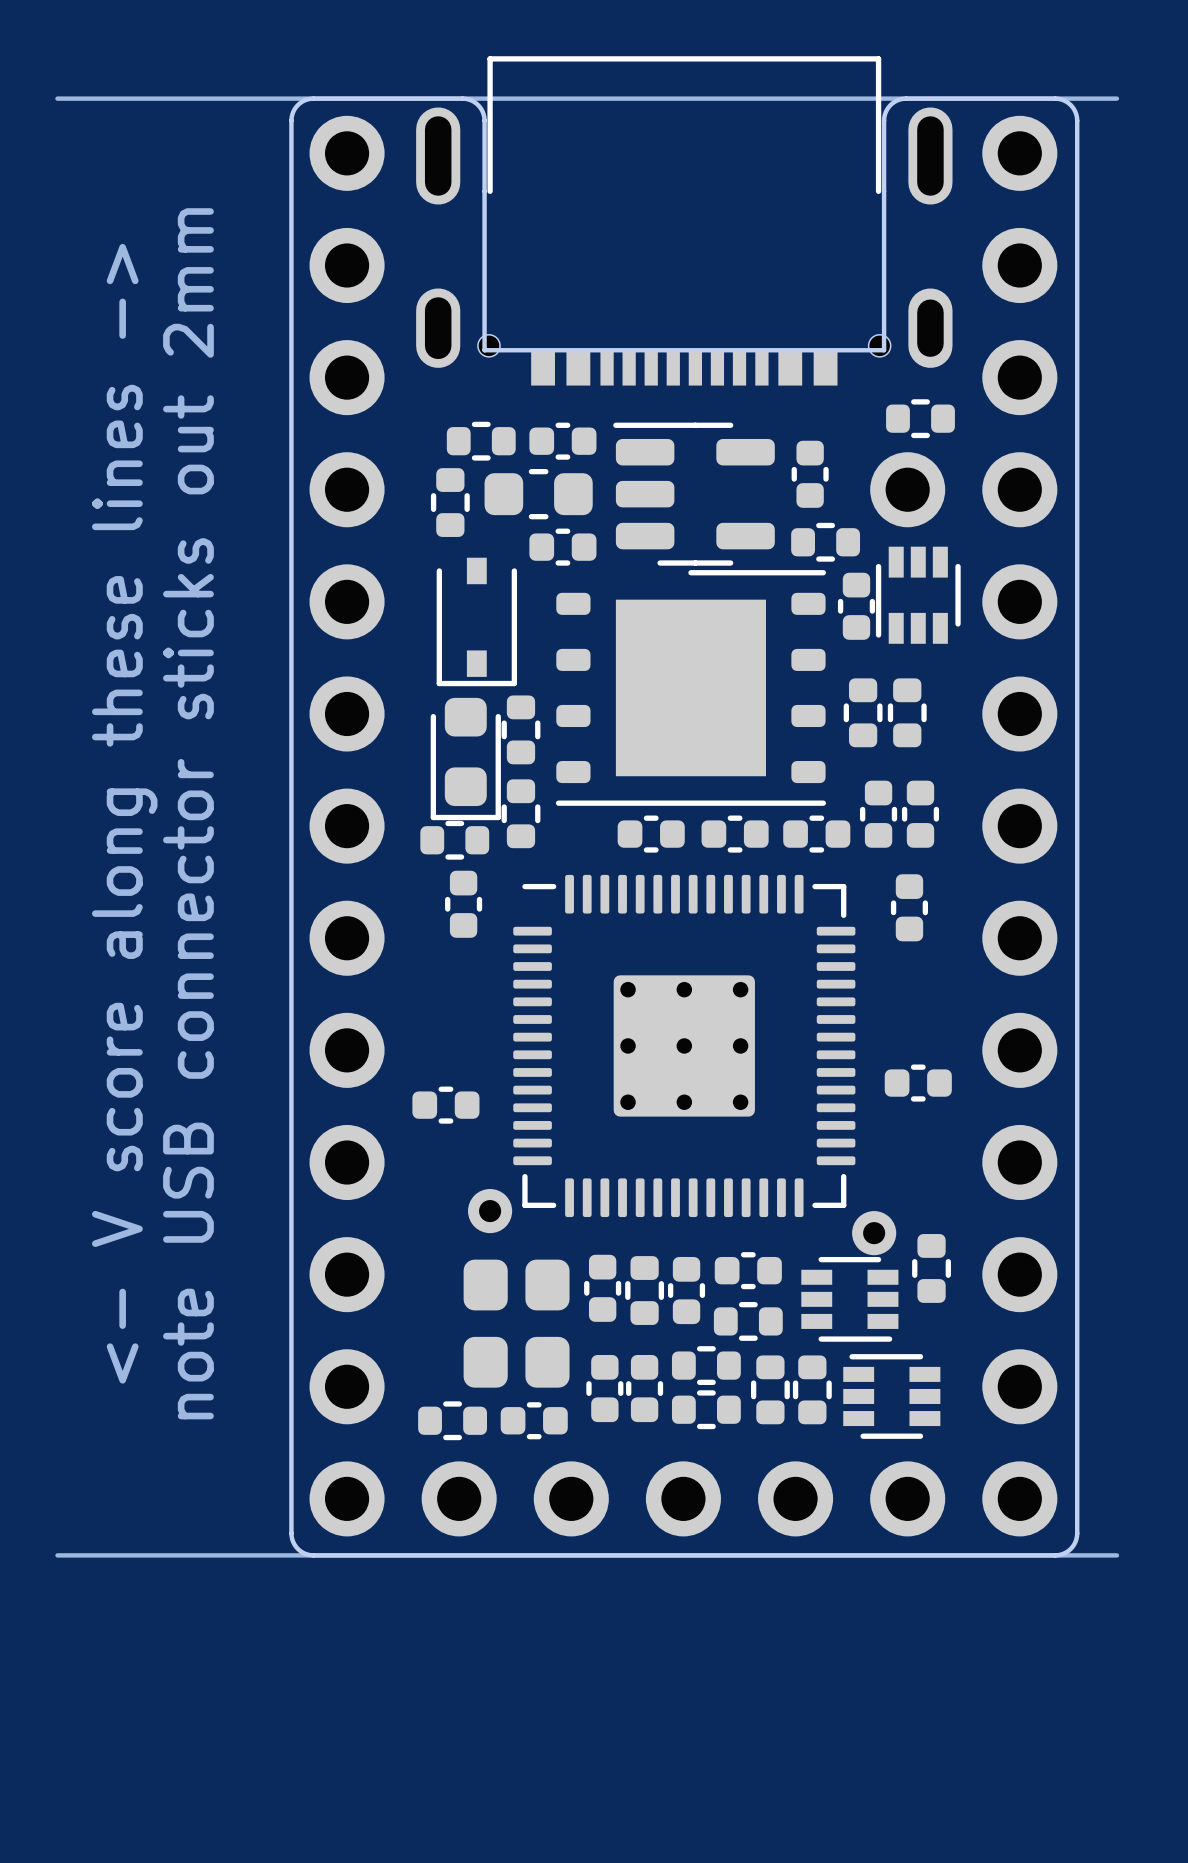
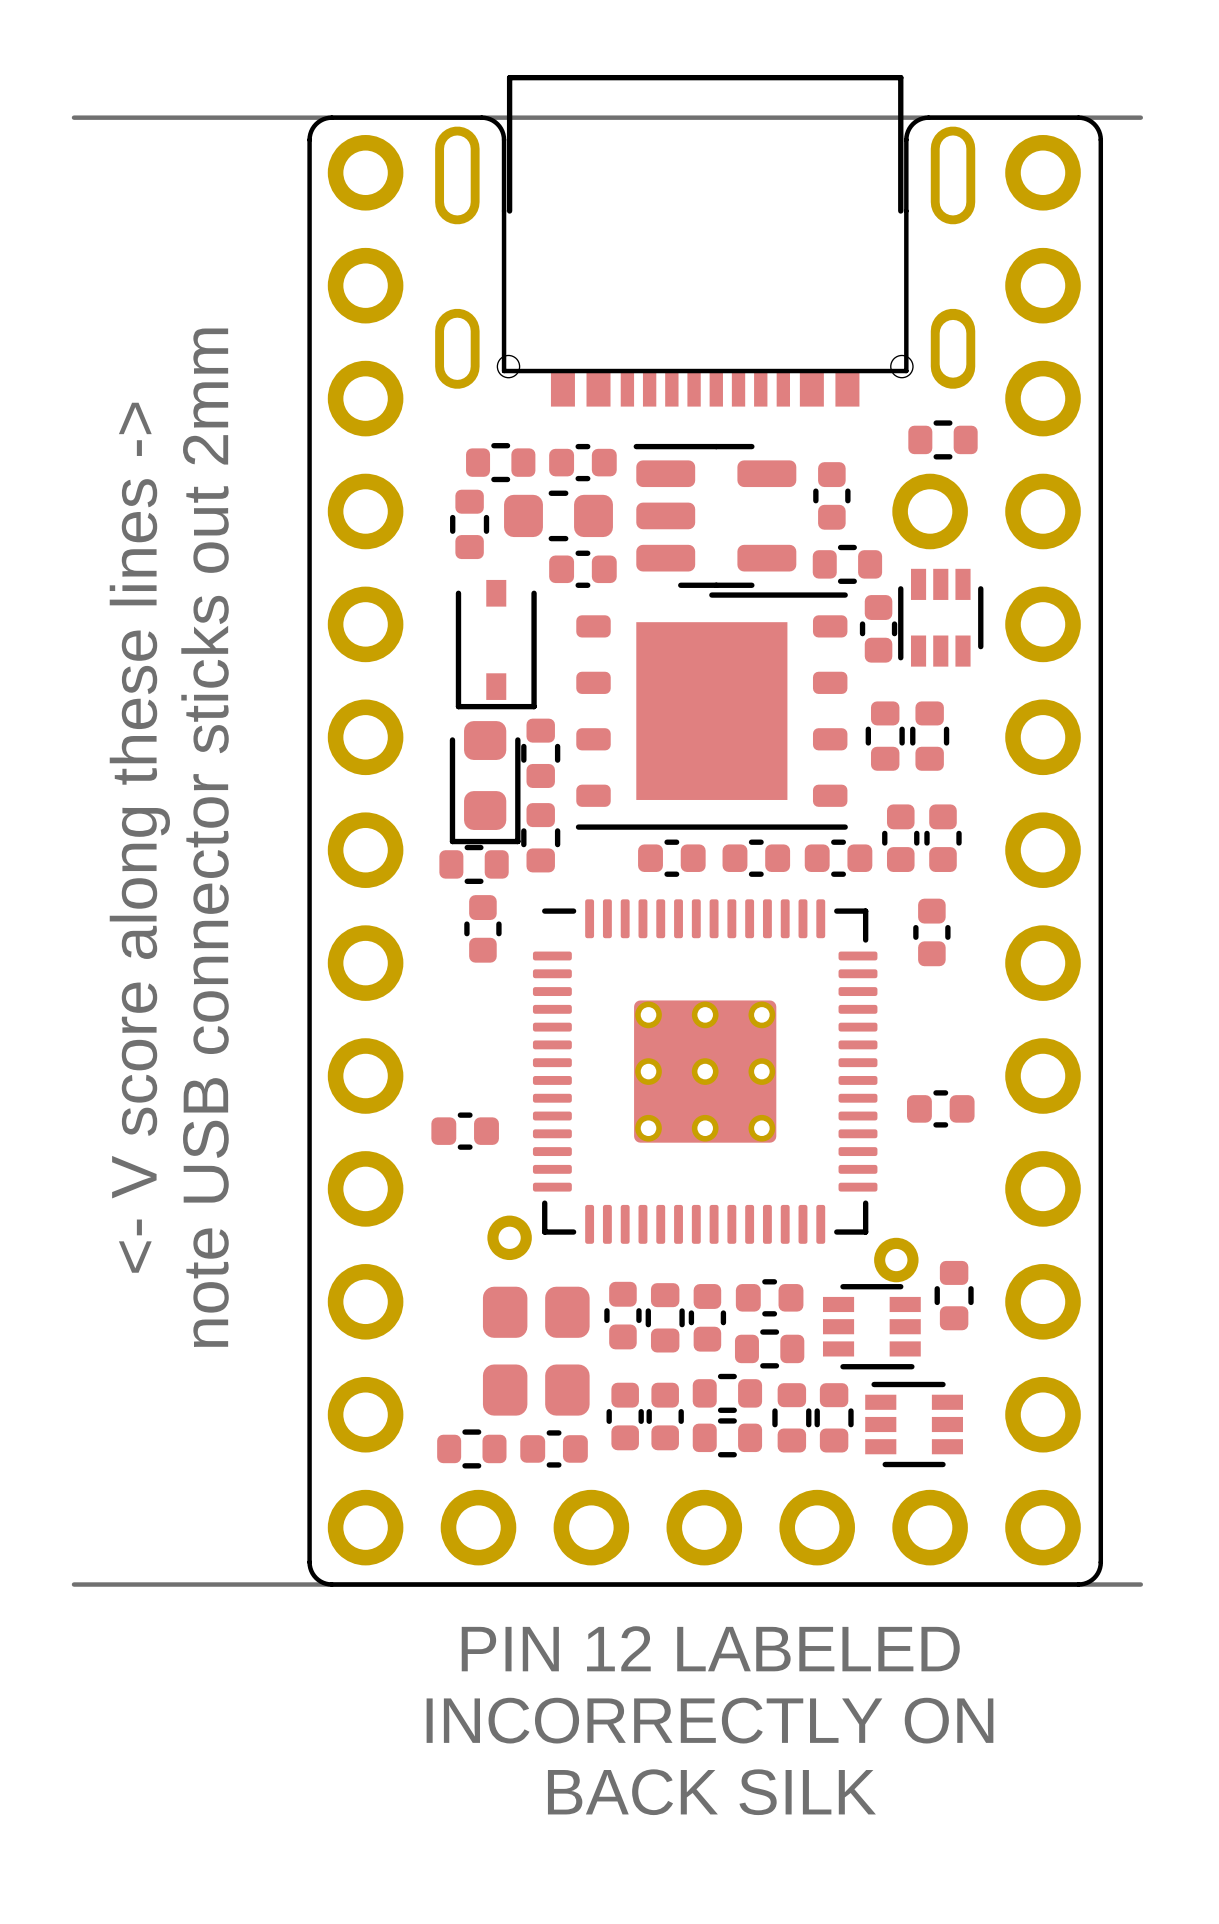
text: none -> PIN 12 LABELED (710, 1648)
text: none -> INCORRECTLY ON (709, 1720)
text: none -> BACK SILK (711, 1792)

